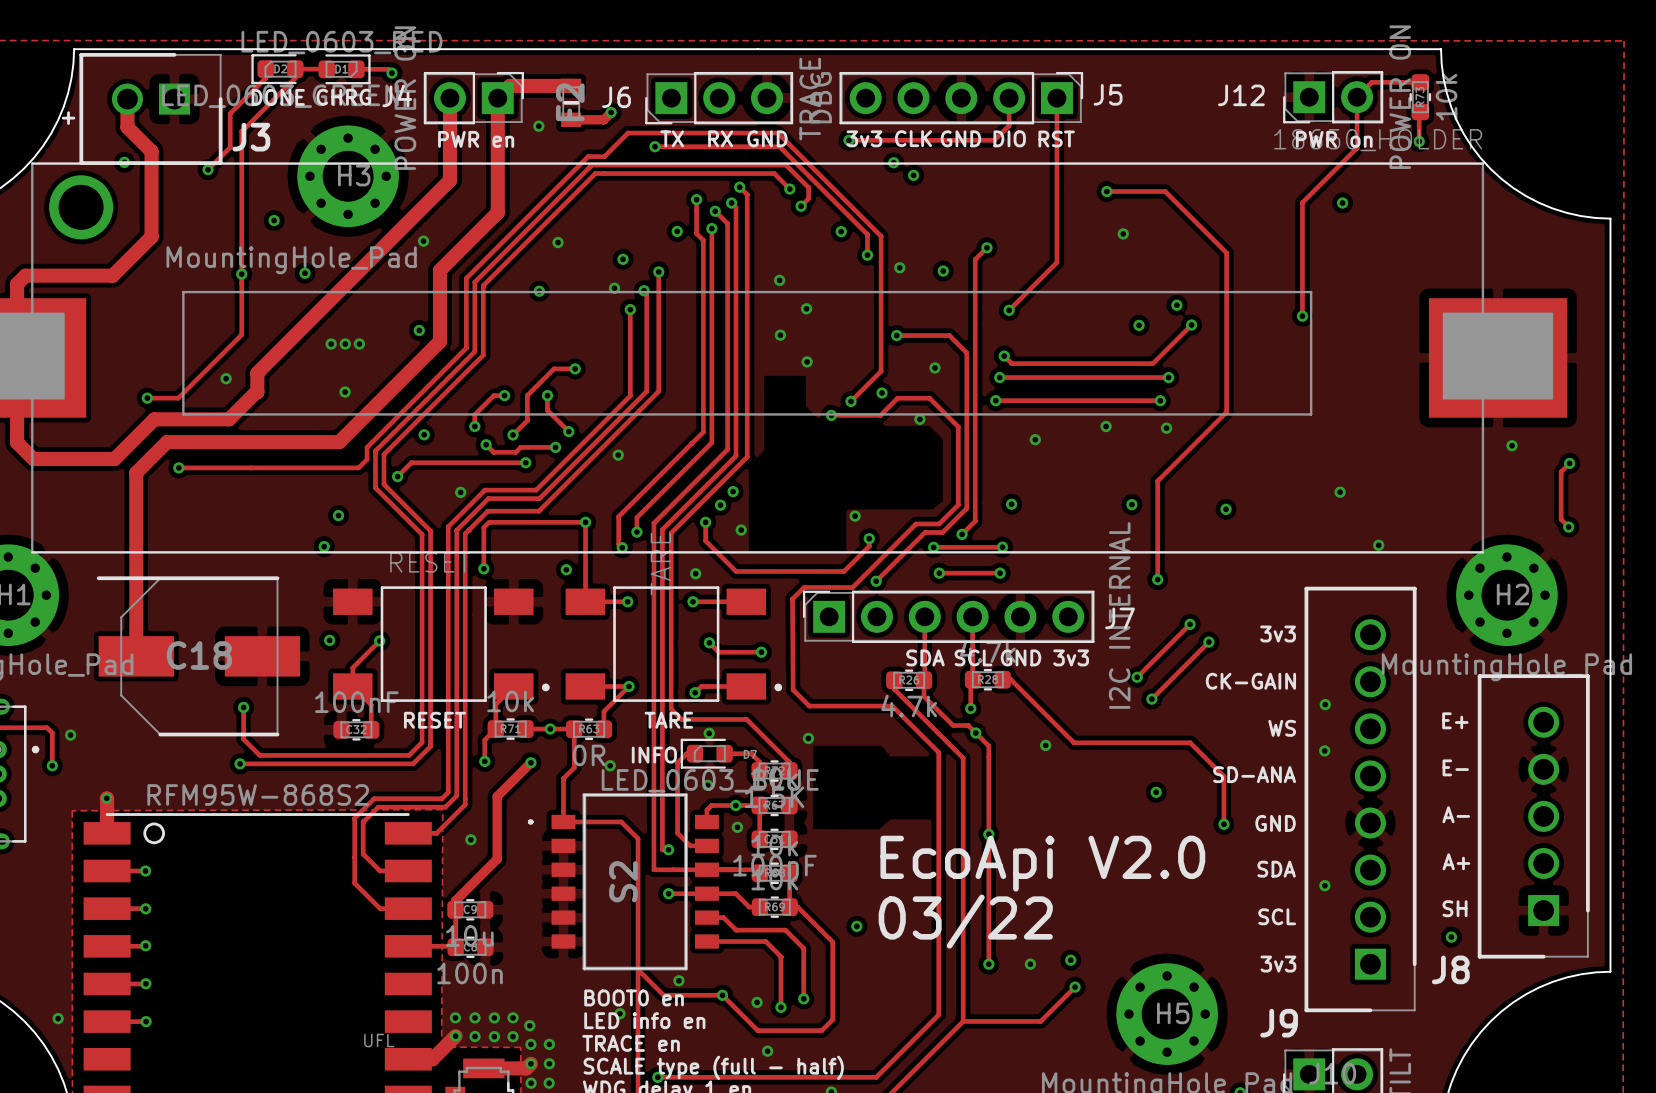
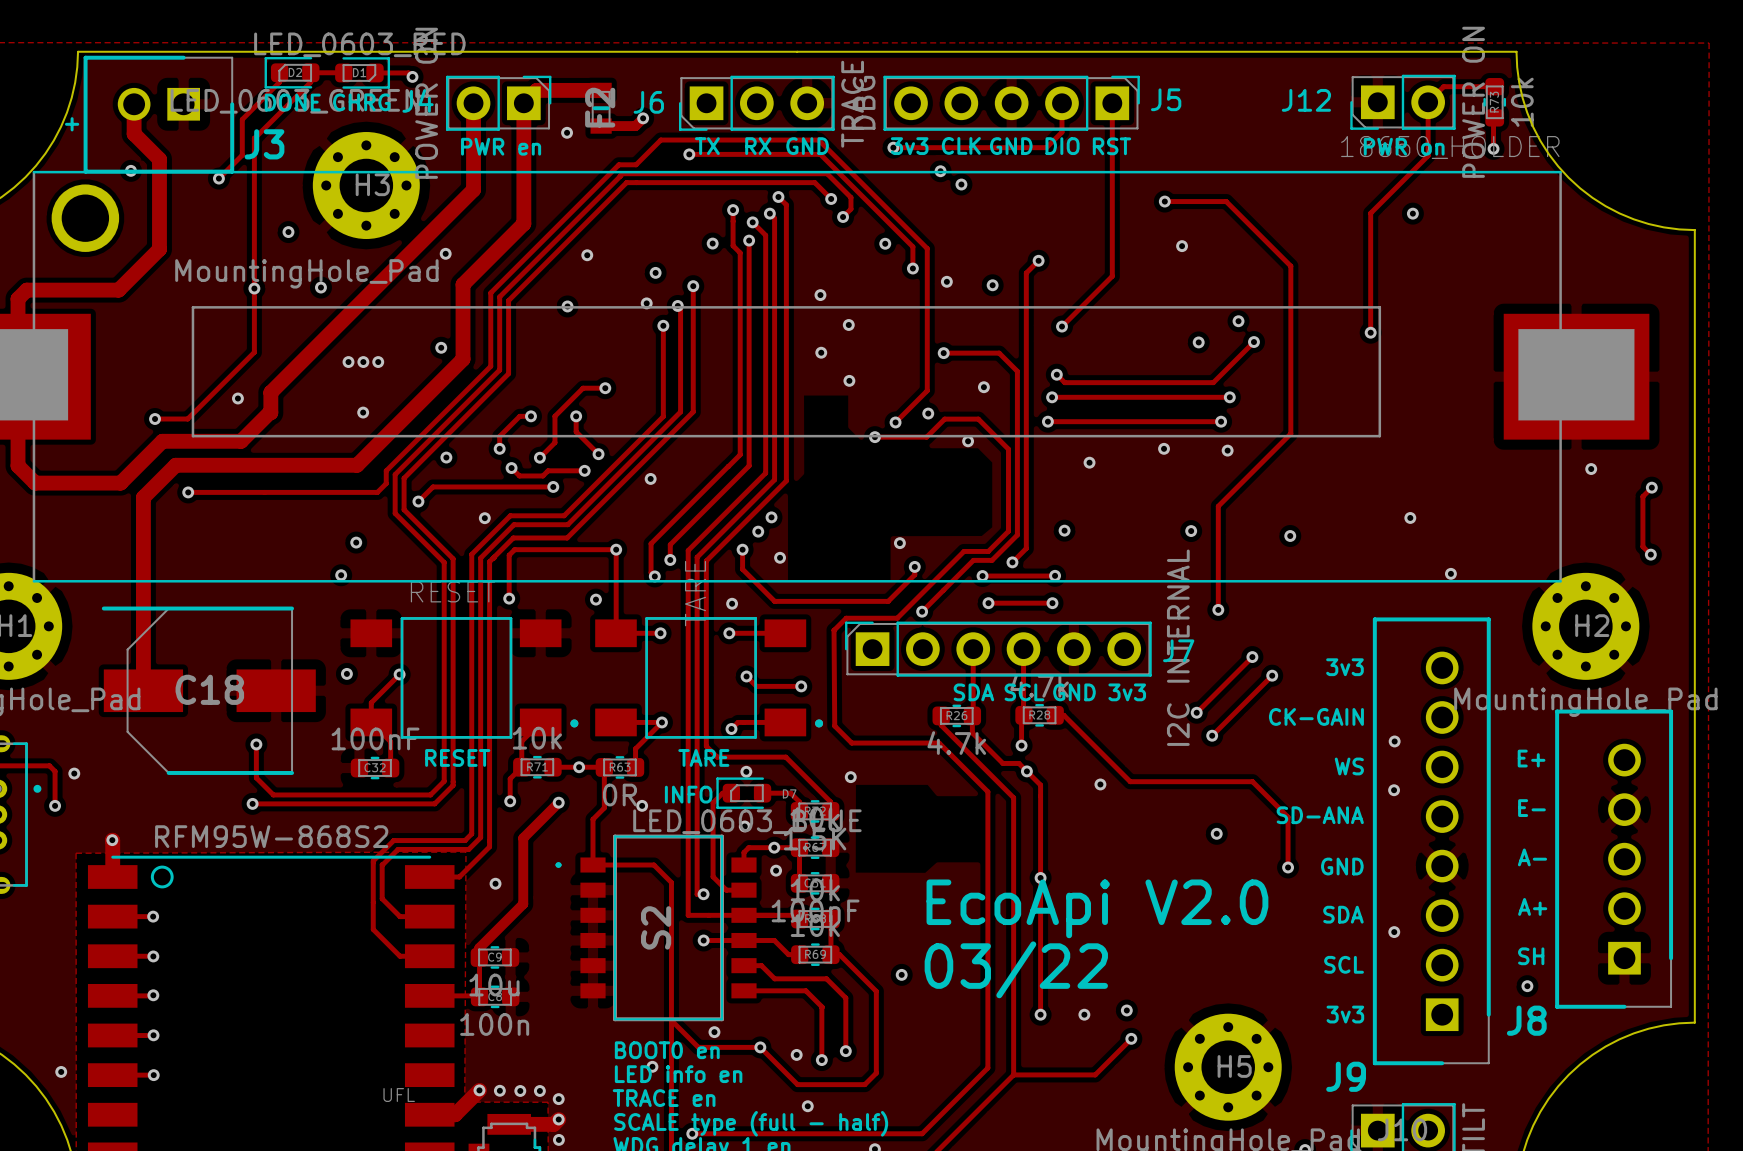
via: (455, 1017) -> none
via: (475, 1017) -> none
via: (494, 1017) -> none
via: (513, 1017) -> none
via: (529, 1025) -> none
via: (549, 1044) -> none
via: (549, 1063) -> none
via: (549, 1083) -> none

